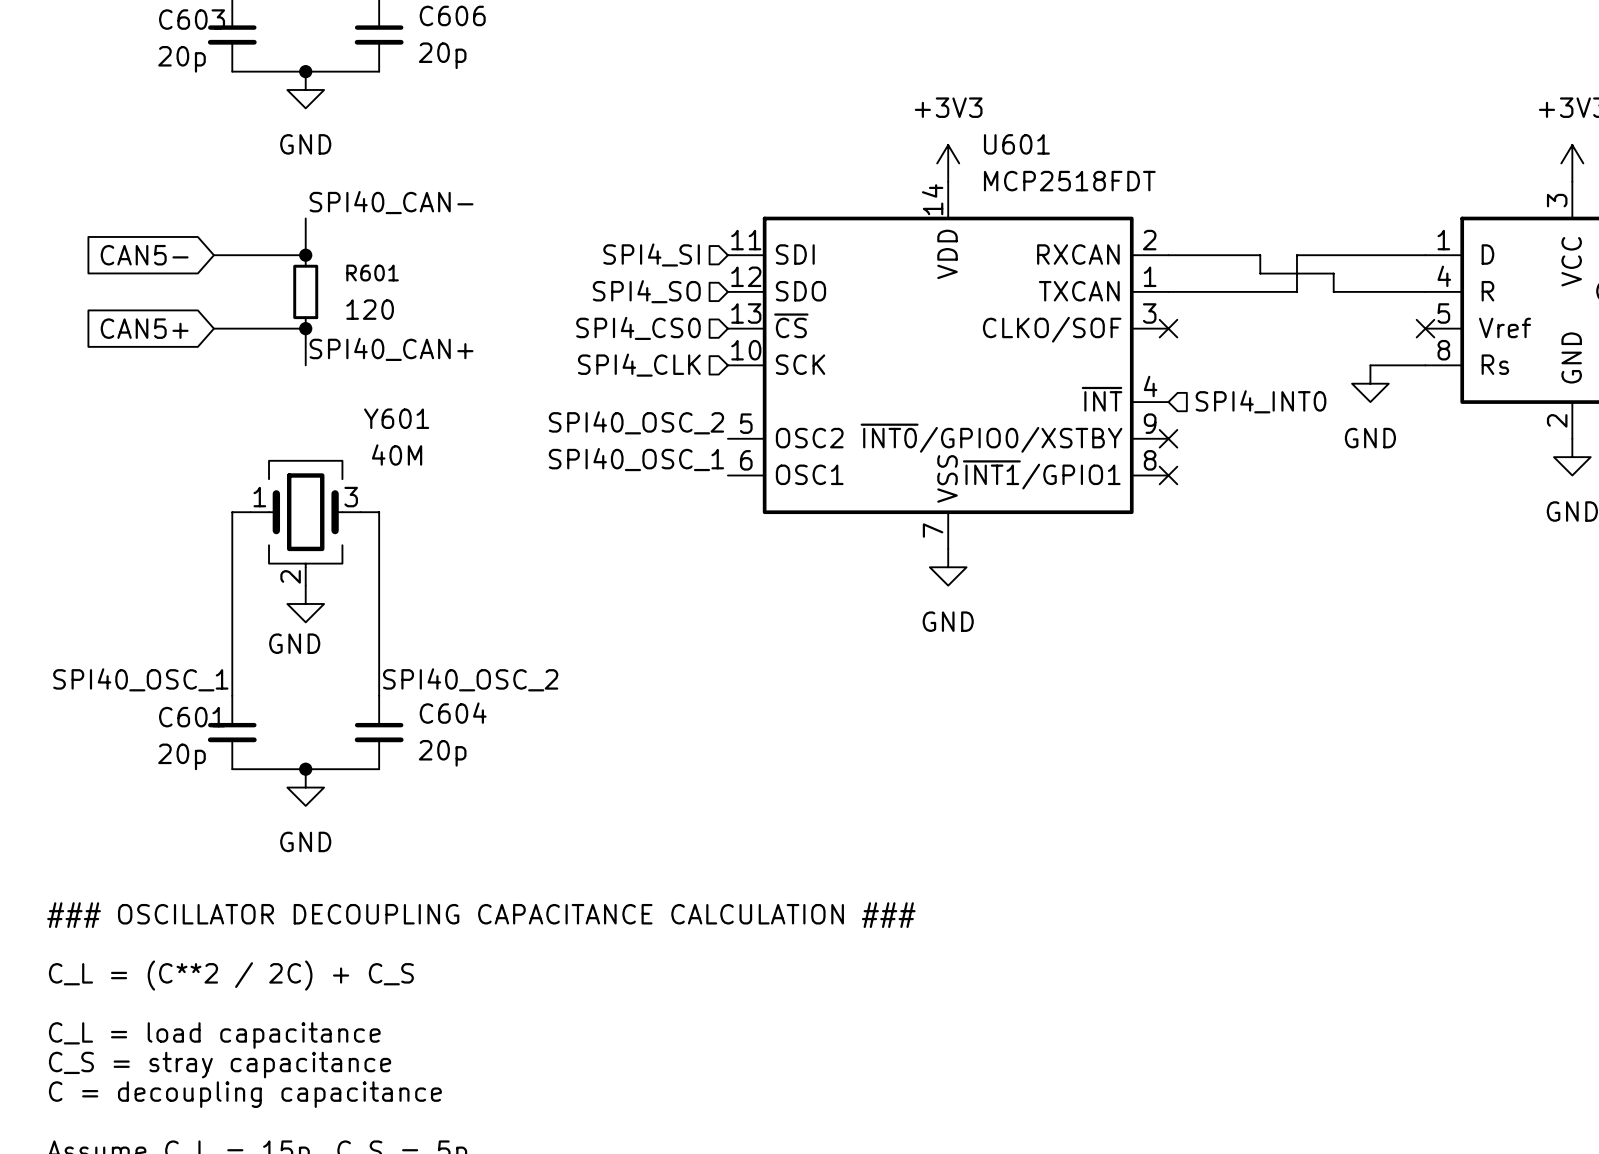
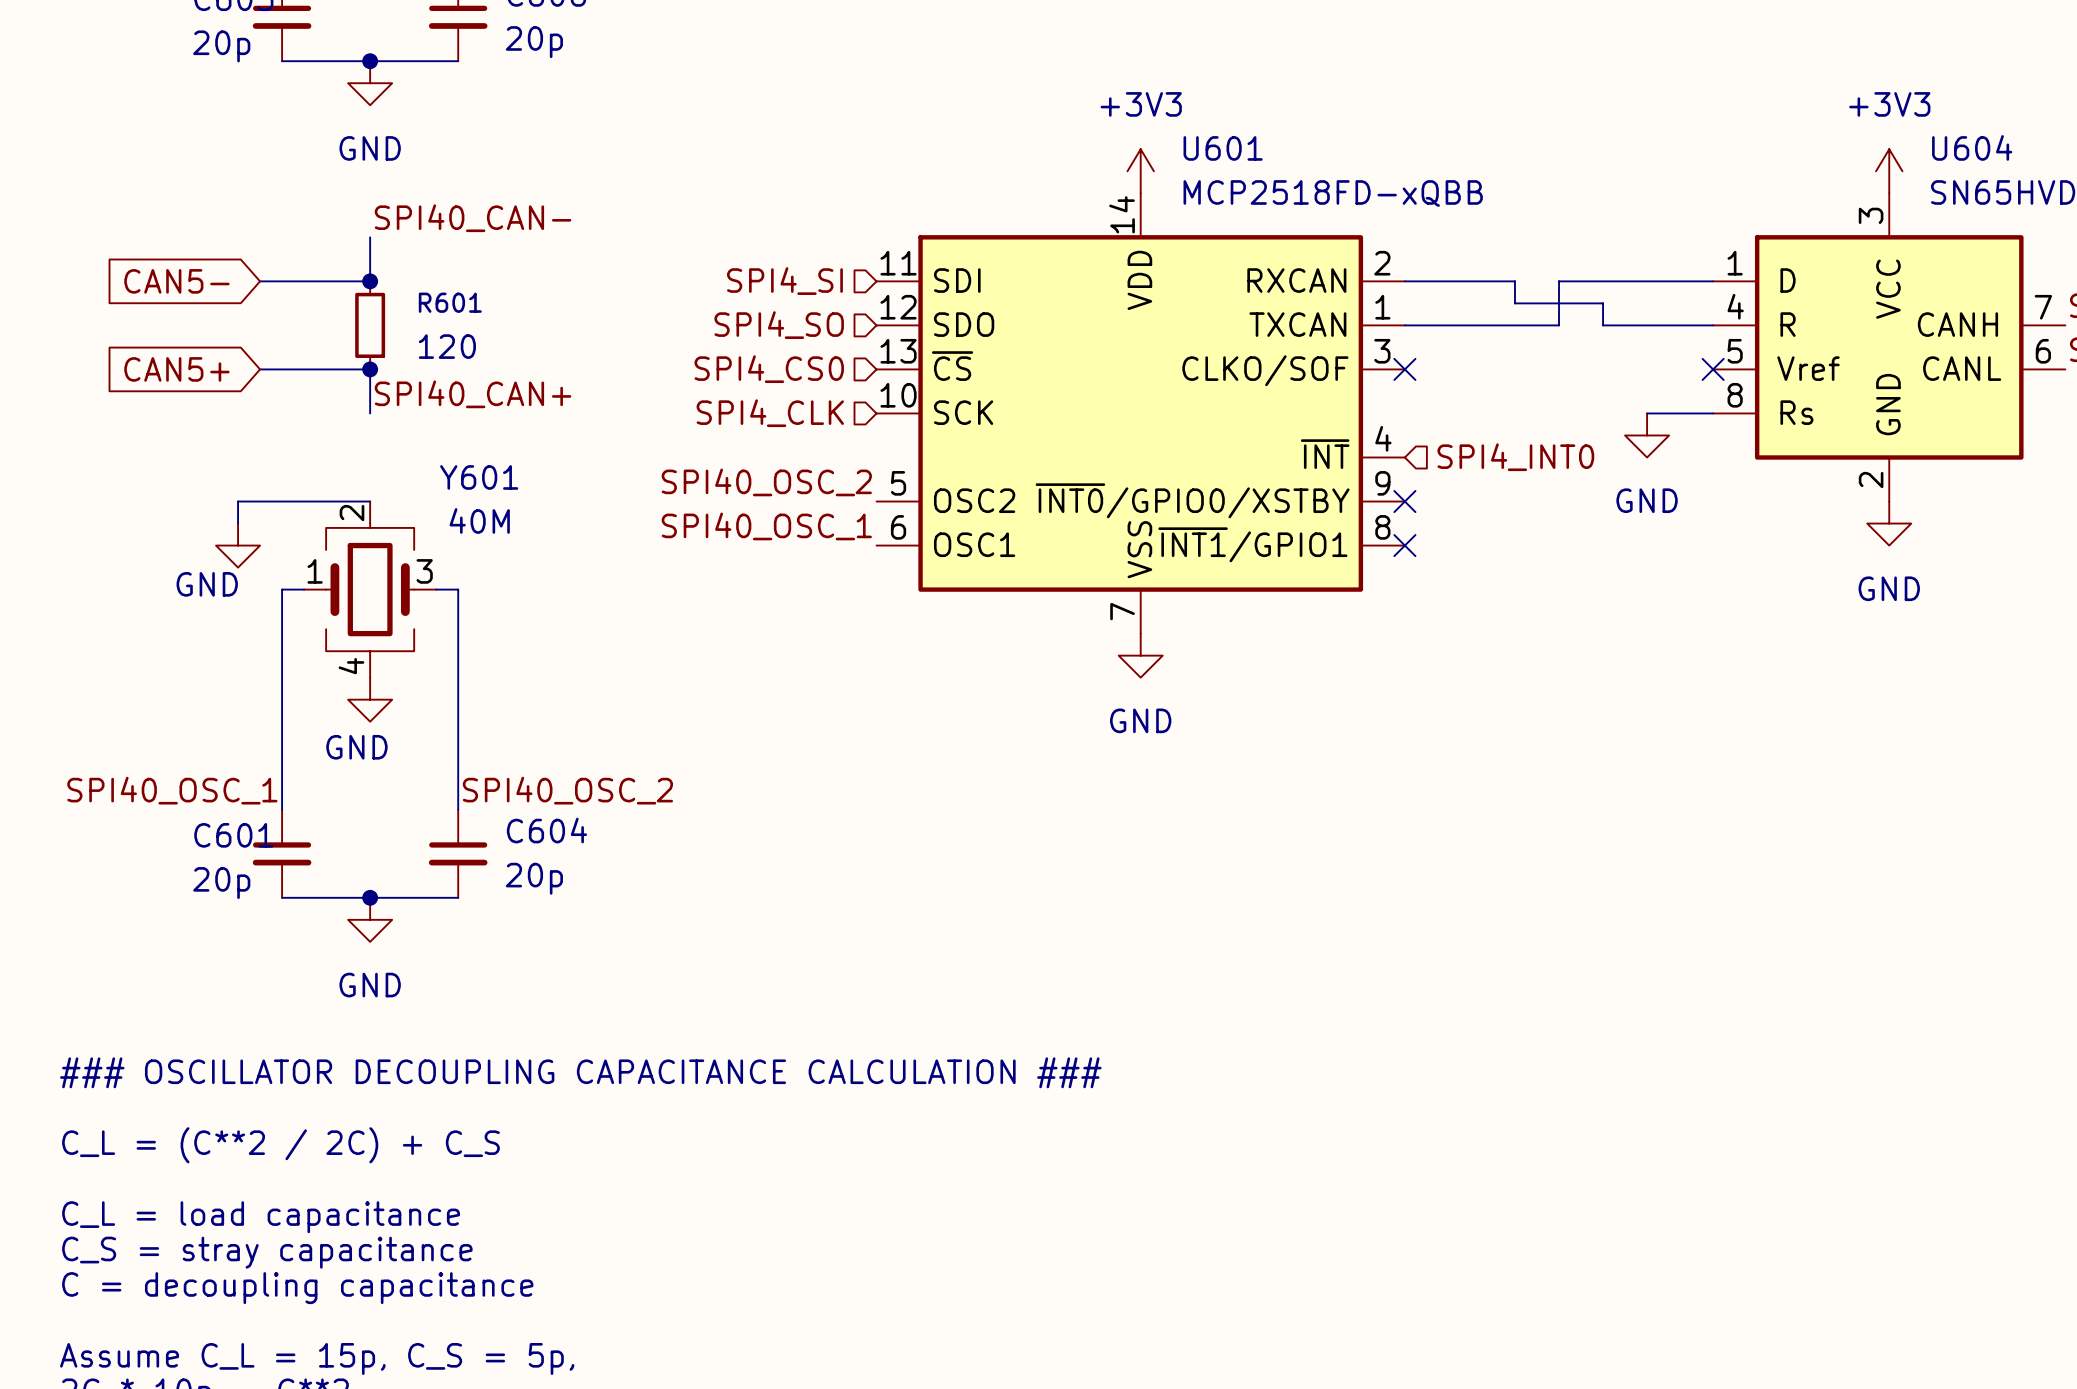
U601 value: MCP2518FDT (1069, 181) -> MCP2518FD-xQBB (1333, 193)
wire: none -> (370, 501) (238, 501) (238, 523)
Y601 symbol: [250, 460, 361, 586] -> [304, 501, 437, 678]
power symbol: none -> GND (238, 545)

